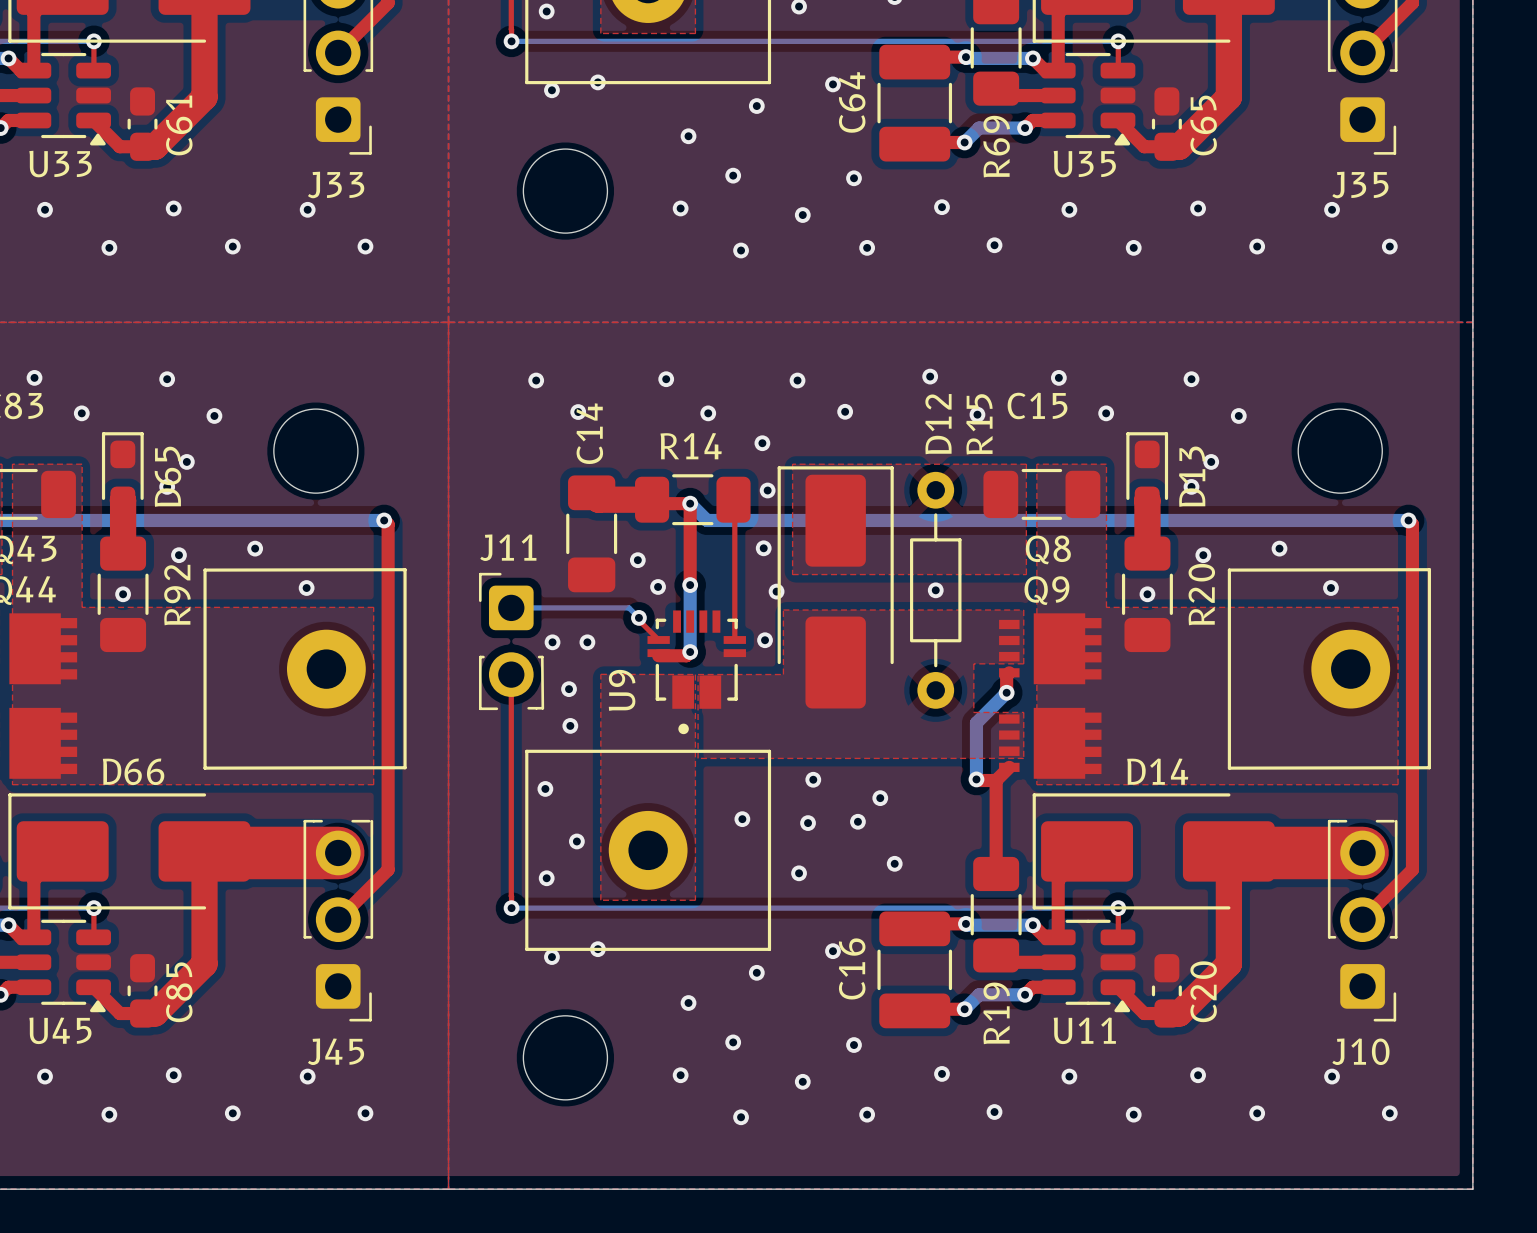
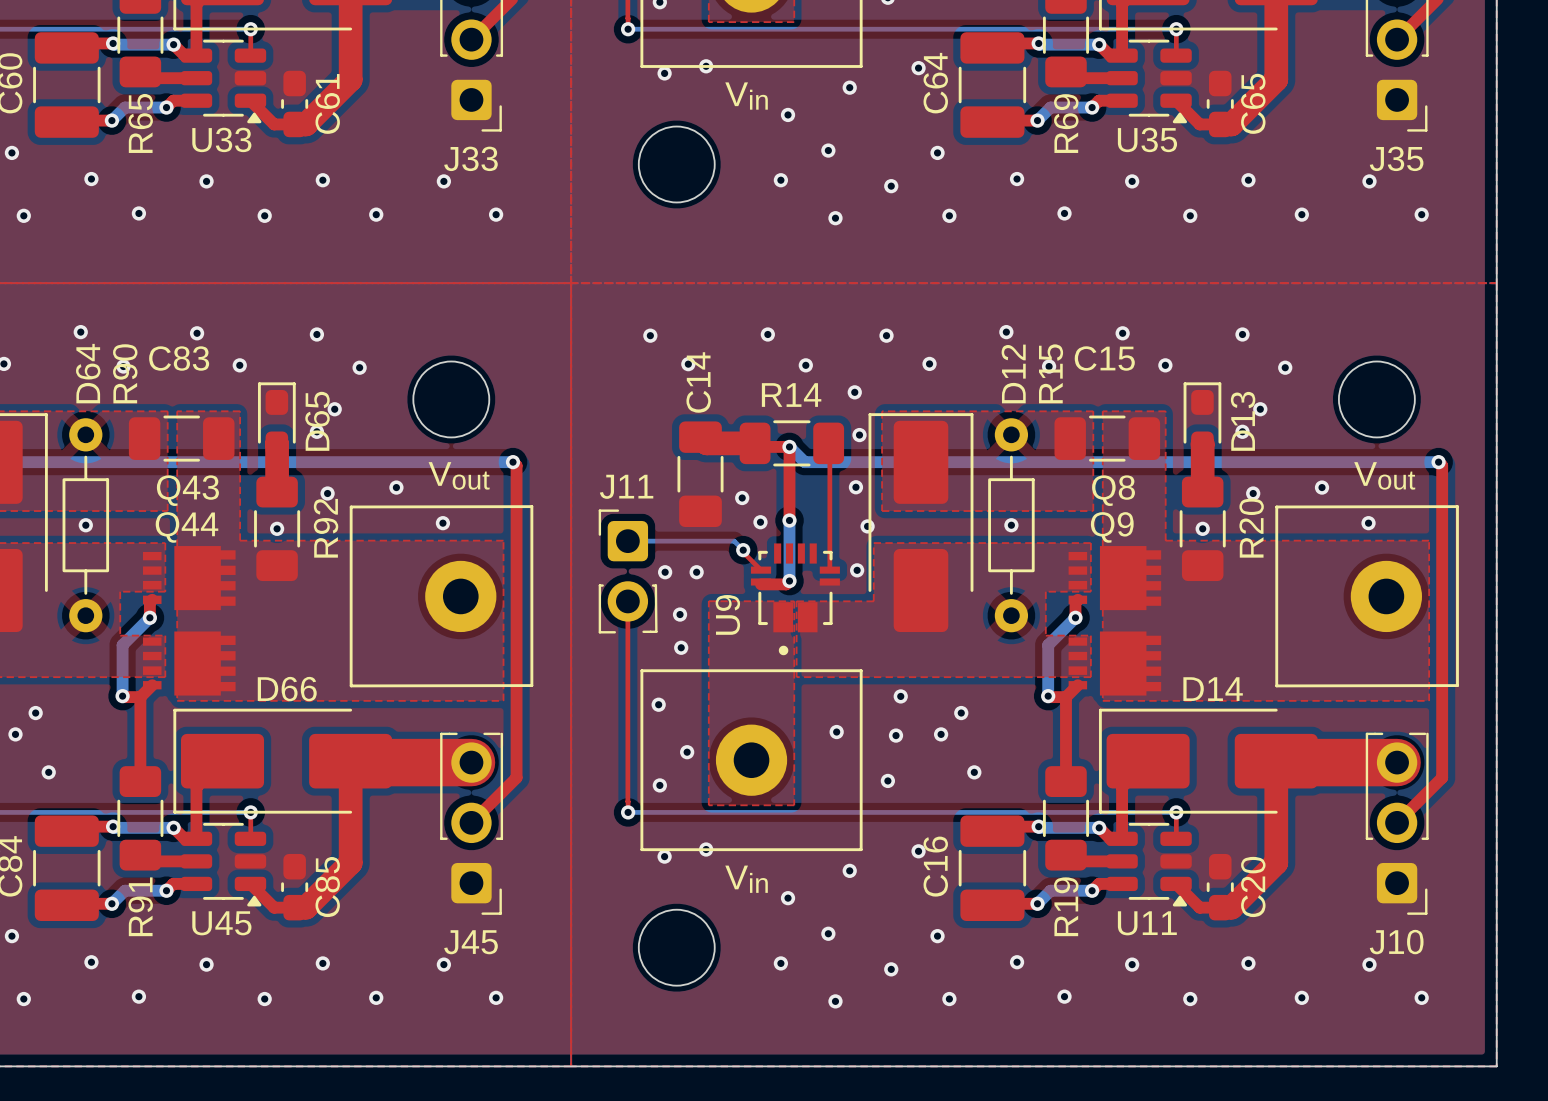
text: none -> Vin (746, 96)
text: none -> Vout (459, 475)
text: none -> Vout (1384, 475)
text: none -> Vin (746, 879)

